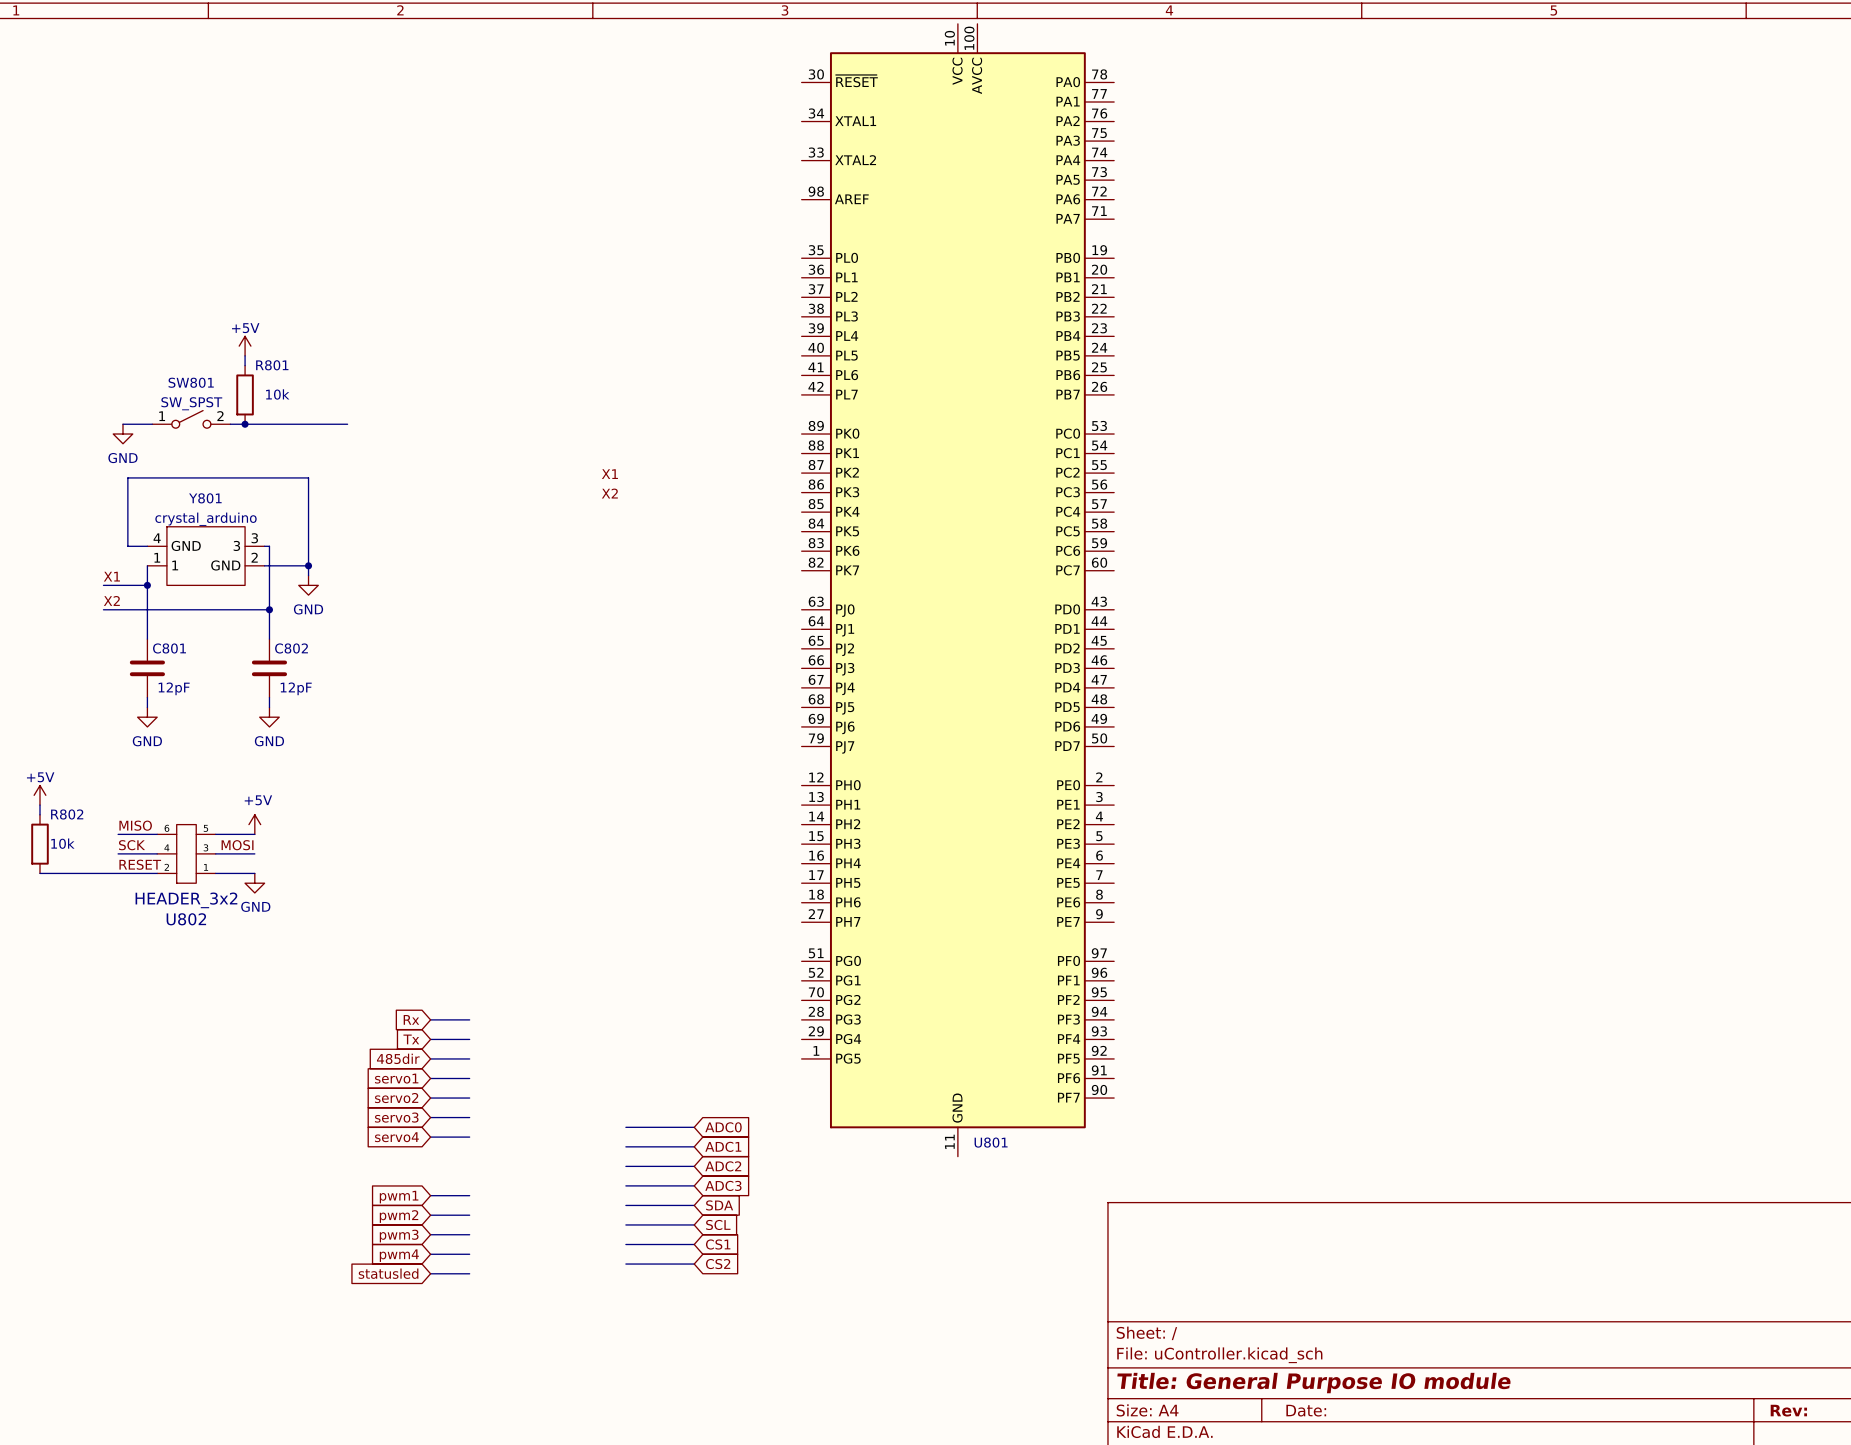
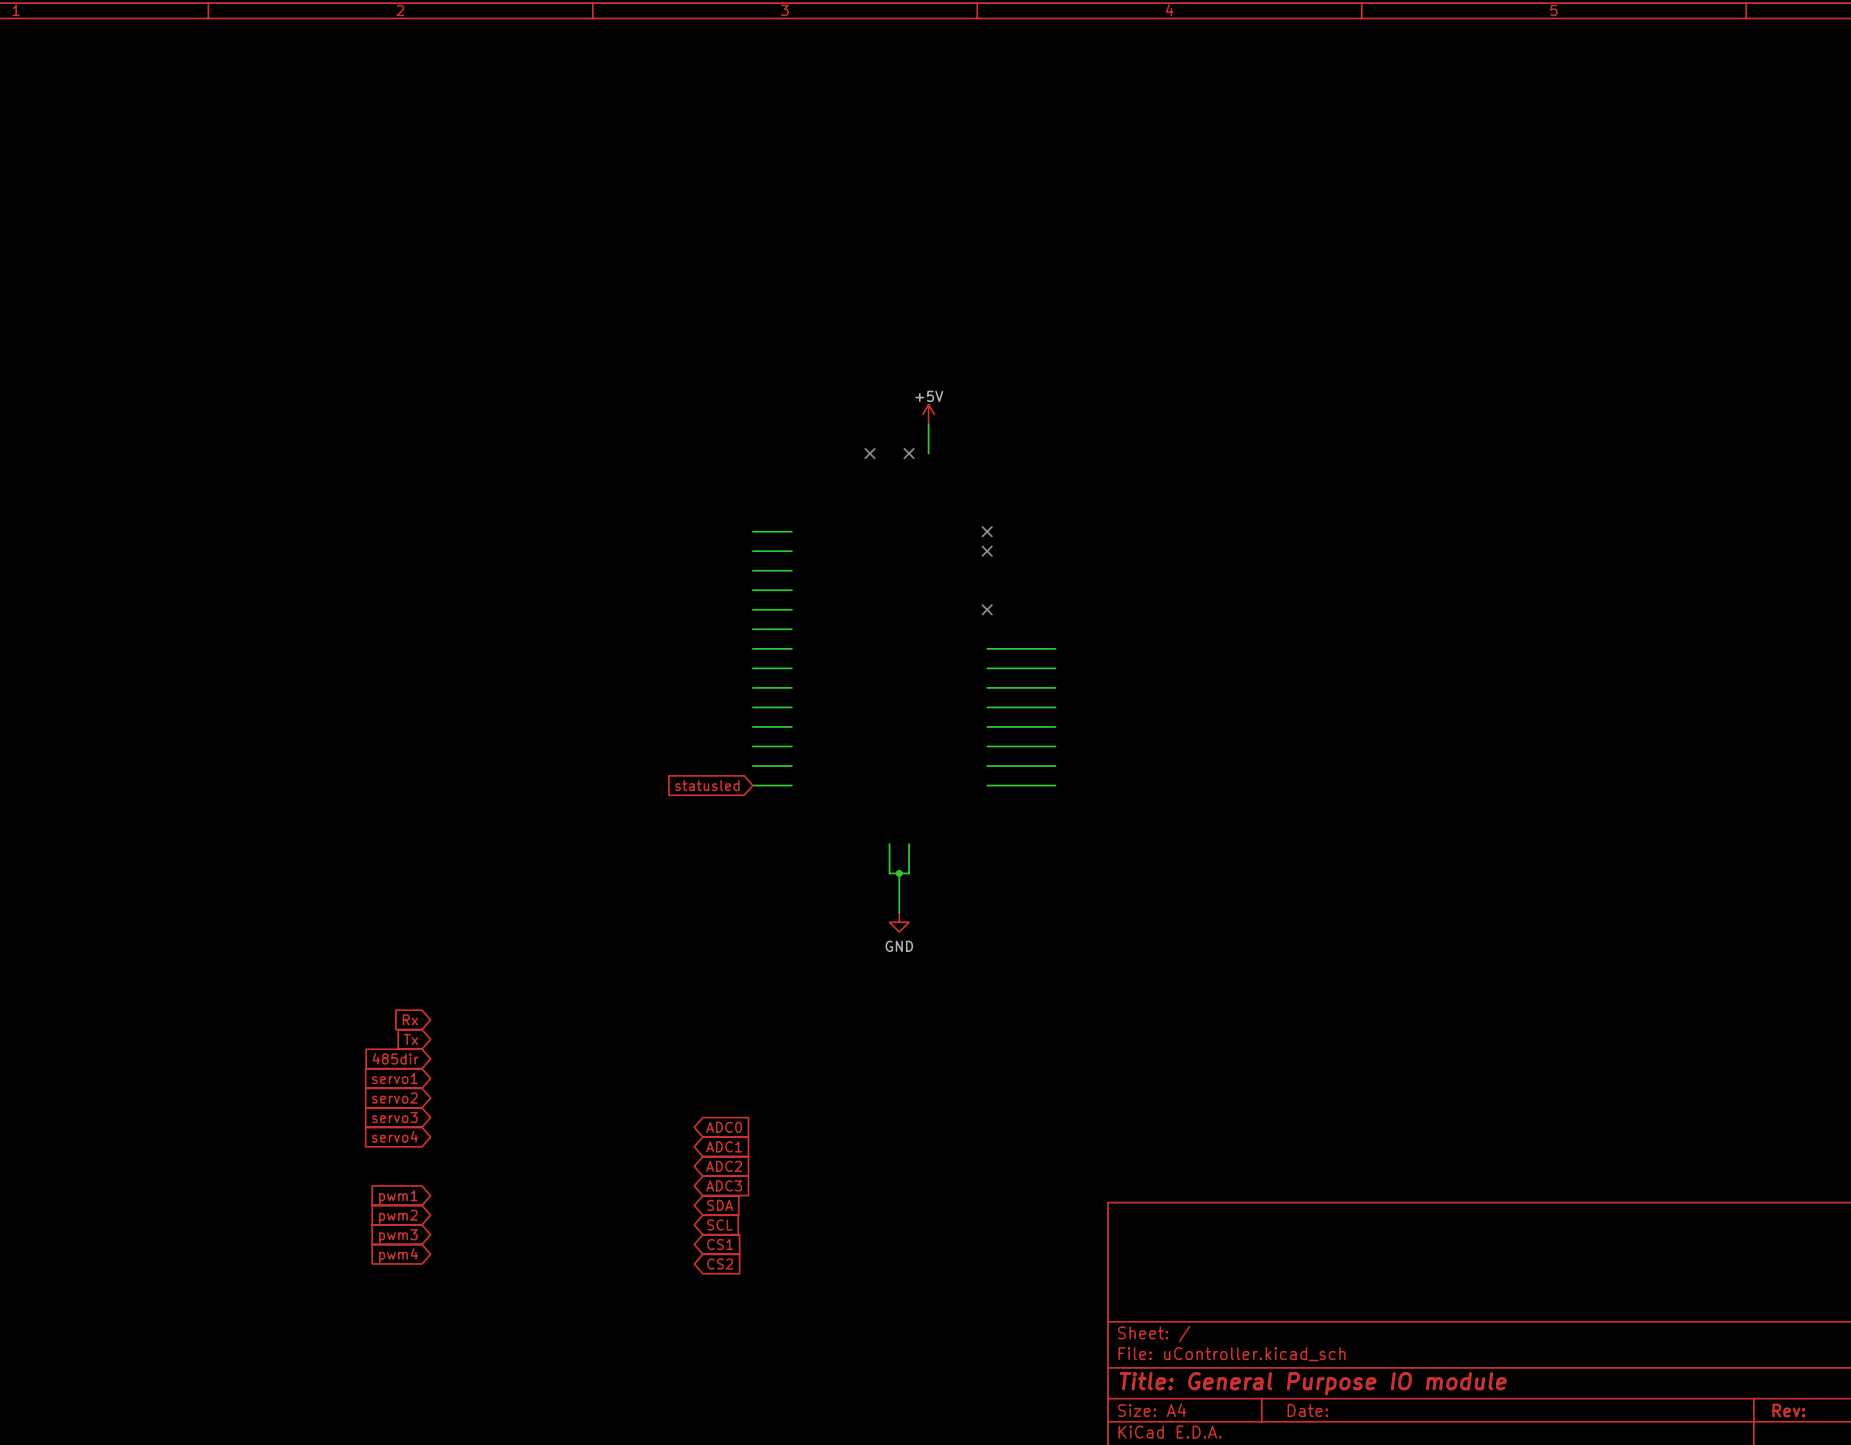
power symbol: +5V (245, 346) -> none
wire: (245, 355) (245, 365) -> none
R801: 10k (245, 394) -> none
power symbol: none -> +5V (928, 414)
SW801: SW_SPST (191, 419) -> none
wire: (122, 424) (152, 424) -> none
wire: (230, 424) (347, 424) -> none
junction: (245, 424) -> none
power symbol: GND (122, 434) -> none
no-connect mark: none -> (870, 453)
no-connect mark: none -> (909, 453)
label: X1 (609, 474) -> none
label: X2 (609, 493) -> none
wire: none -> (752, 531) (791, 531)
no-connect mark: none -> (987, 531)
wire: (147, 546) (127, 546) (127, 477) (308, 477) (308, 575) -> none
wire: (264, 546) (269, 546) (269, 639) -> none
wire: none -> (752, 551) (791, 551)
no-connect mark: none -> (987, 551)
Y801: crystal_arduino (206, 556) -> none
wire: (147, 565) (147, 639) -> none
wire: (264, 565) (308, 565) -> none
junction: (308, 565) -> none
wire: none -> (752, 570) (791, 570)
label: X1 (111, 576) -> none
wire: (103, 585) (147, 585) -> none
junction: (147, 585) -> none
power symbol: GND (308, 585) -> none
wire: none -> (752, 590) (791, 590)
U801: (957, 590) -> none
label: X2 (111, 600) -> none
wire: (103, 609) (269, 609) -> none
junction: (269, 609) -> none
wire: none -> (752, 609) (791, 609)
no-connect mark: none -> (987, 609)
wire: none -> (752, 629) (791, 629)
wire: none -> (752, 648) (791, 648)
C801: 12pF (147, 668) -> none
C802: 12pF (269, 668) -> none
wire: none -> (752, 668) (791, 668)
wire: none -> (752, 687) (791, 687)
wire: (147, 697) (147, 707) -> none
wire: (269, 697) (269, 707) -> none
wire: none -> (752, 707) (791, 707)
power symbol: GND (147, 717) -> none
power symbol: GND (269, 717) -> none
wire: none -> (752, 726) (791, 726)
wire: none -> (752, 746) (791, 746)
wire: none -> (752, 766) (791, 766)
global label: none -> statusled (707, 785)
wire: none -> (752, 785) (791, 785)
power symbol: +5V (39, 795) -> none
wire: (39, 805) (39, 814) -> none
power symbol: +5V (254, 824) -> none
label: MISO (135, 825) -> none
wire: (118, 834) (157, 834) -> none
wire: (215, 834) (254, 834) -> none
R802: 10k (39, 844) -> none
label: SCK (132, 845) -> none
label: MOSI (237, 845) -> none
wire: (118, 853) (157, 853) -> none
U802: HEADER_3x2 (186, 853) -> none
wire: (215, 853) (254, 853) -> none
label: RESET (140, 864) -> none
wire: (39, 873) (157, 873) -> none
wire: (215, 873) (254, 873) -> none
junction: none -> (899, 873)
power symbol: GND (254, 883) -> none
power symbol: none -> GND (899, 922)
wire: (430, 1019) (469, 1019) -> none
wire: (430, 1039) (469, 1039) -> none
wire: (430, 1058) (469, 1058) -> none
wire: (430, 1078) (469, 1078) -> none
wire: (430, 1098) (469, 1098) -> none
wire: (430, 1117) (469, 1117) -> none
wire: (625, 1127) (694, 1127) -> none
wire: (430, 1137) (469, 1137) -> none
wire: (625, 1146) (694, 1146) -> none
wire: (625, 1166) (694, 1166) -> none
wire: (625, 1185) (694, 1185) -> none
wire: (430, 1195) (469, 1195) -> none
wire: (625, 1205) (694, 1205) -> none
wire: (430, 1215) (469, 1215) -> none
wire: (625, 1224) (694, 1224) -> none
wire: (430, 1234) (469, 1234) -> none
wire: (625, 1244) (694, 1244) -> none
wire: (430, 1254) (469, 1254) -> none
wire: (625, 1264) (694, 1264) -> none
global label: statusled (388, 1273) -> none
wire: (430, 1273) (469, 1273) -> none

